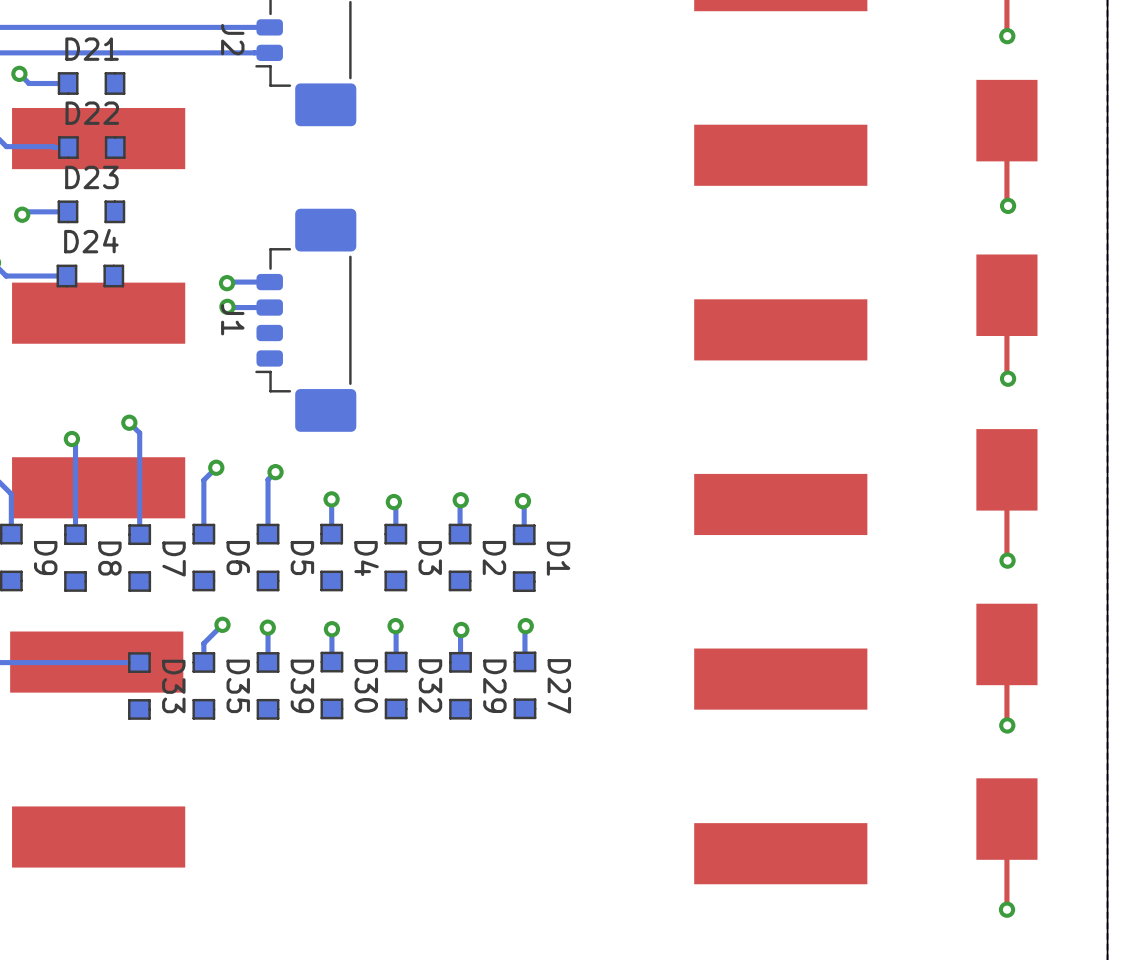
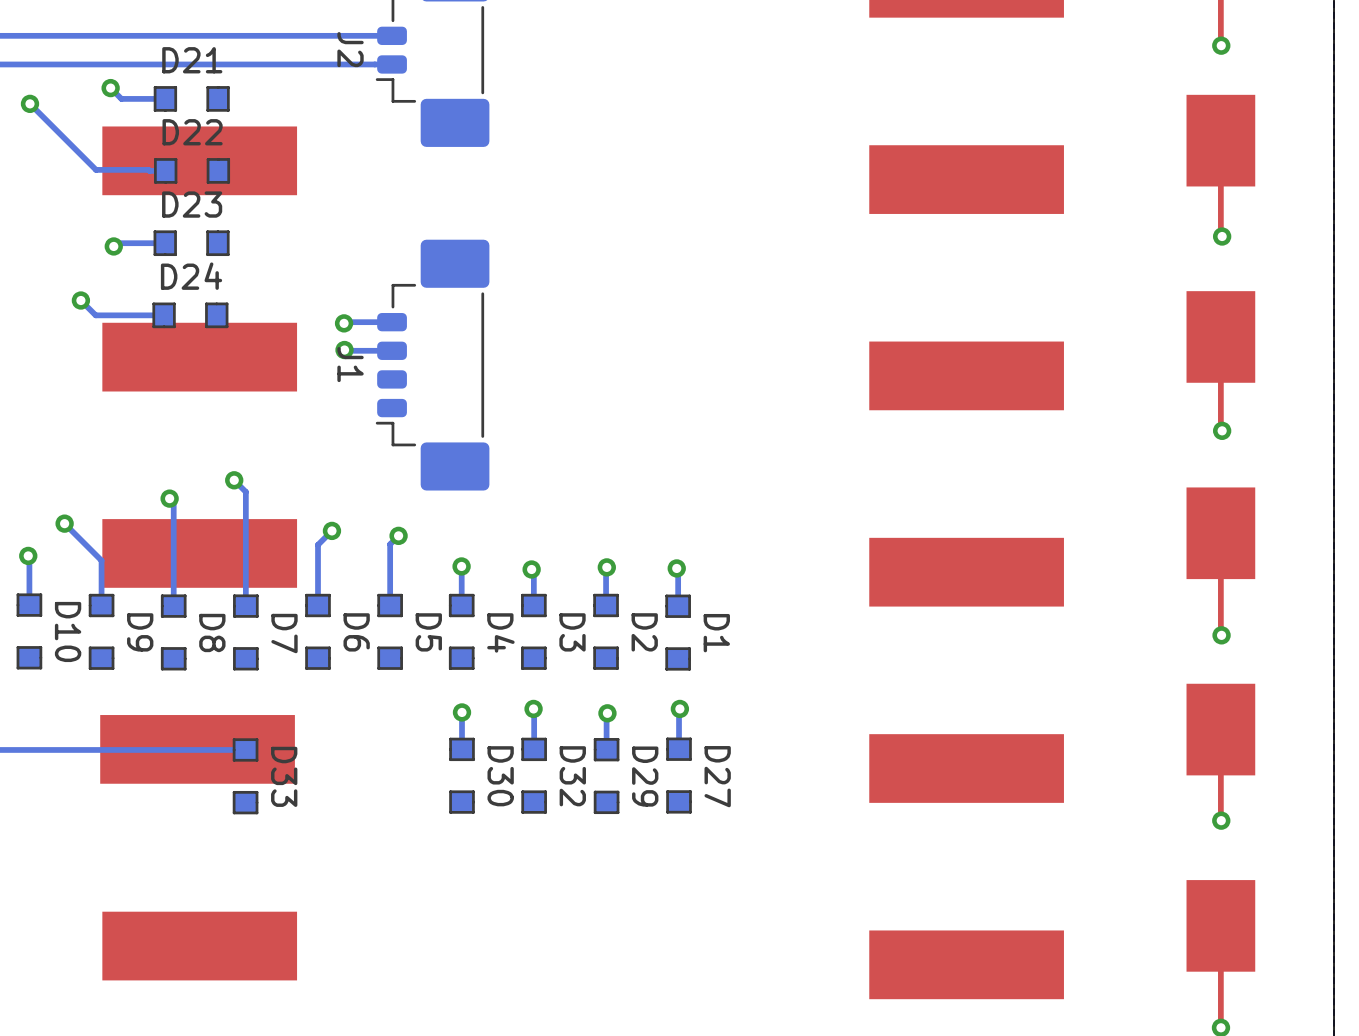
bottom track: (222, 624) (203, 643) (203, 662) -> none
via: (222, 624) -> none
via: (267, 627) -> none
bottom track: (268, 627) (268, 662) -> none
D35: (203, 685) -> none
D39: (268, 685) -> none

